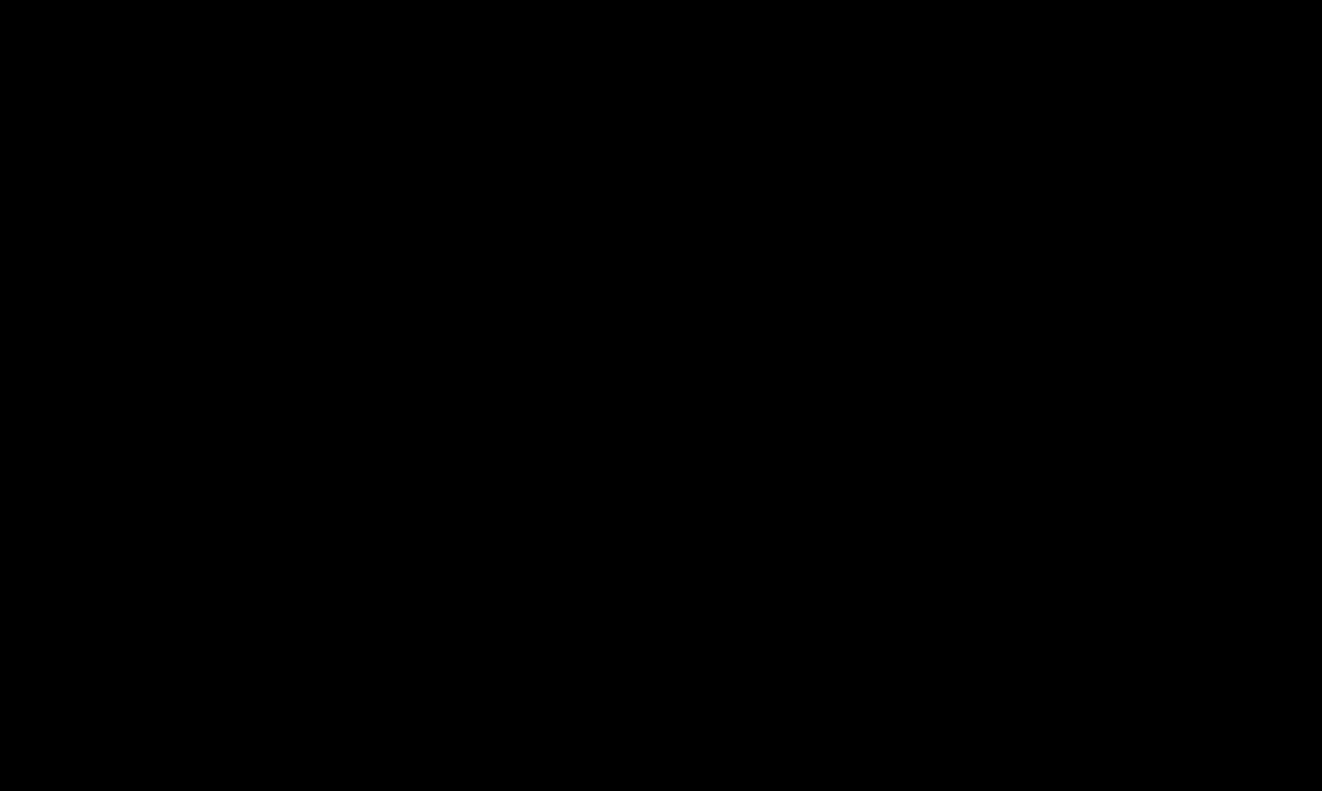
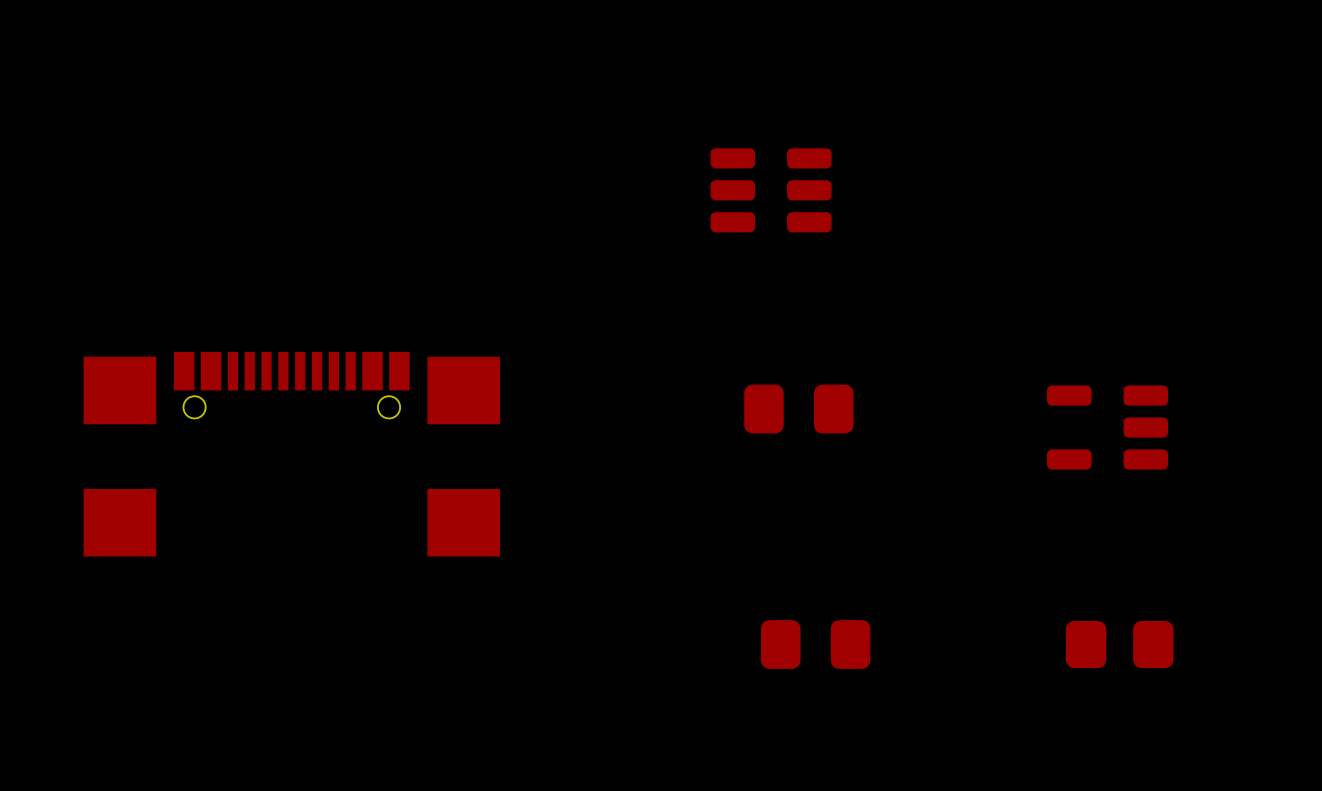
part: none -> (771, 190)
part: none -> (798, 409)
part: none -> (1107, 427)
part: none -> (291, 454)
part: none -> (815, 644)
part: none -> (1119, 644)

